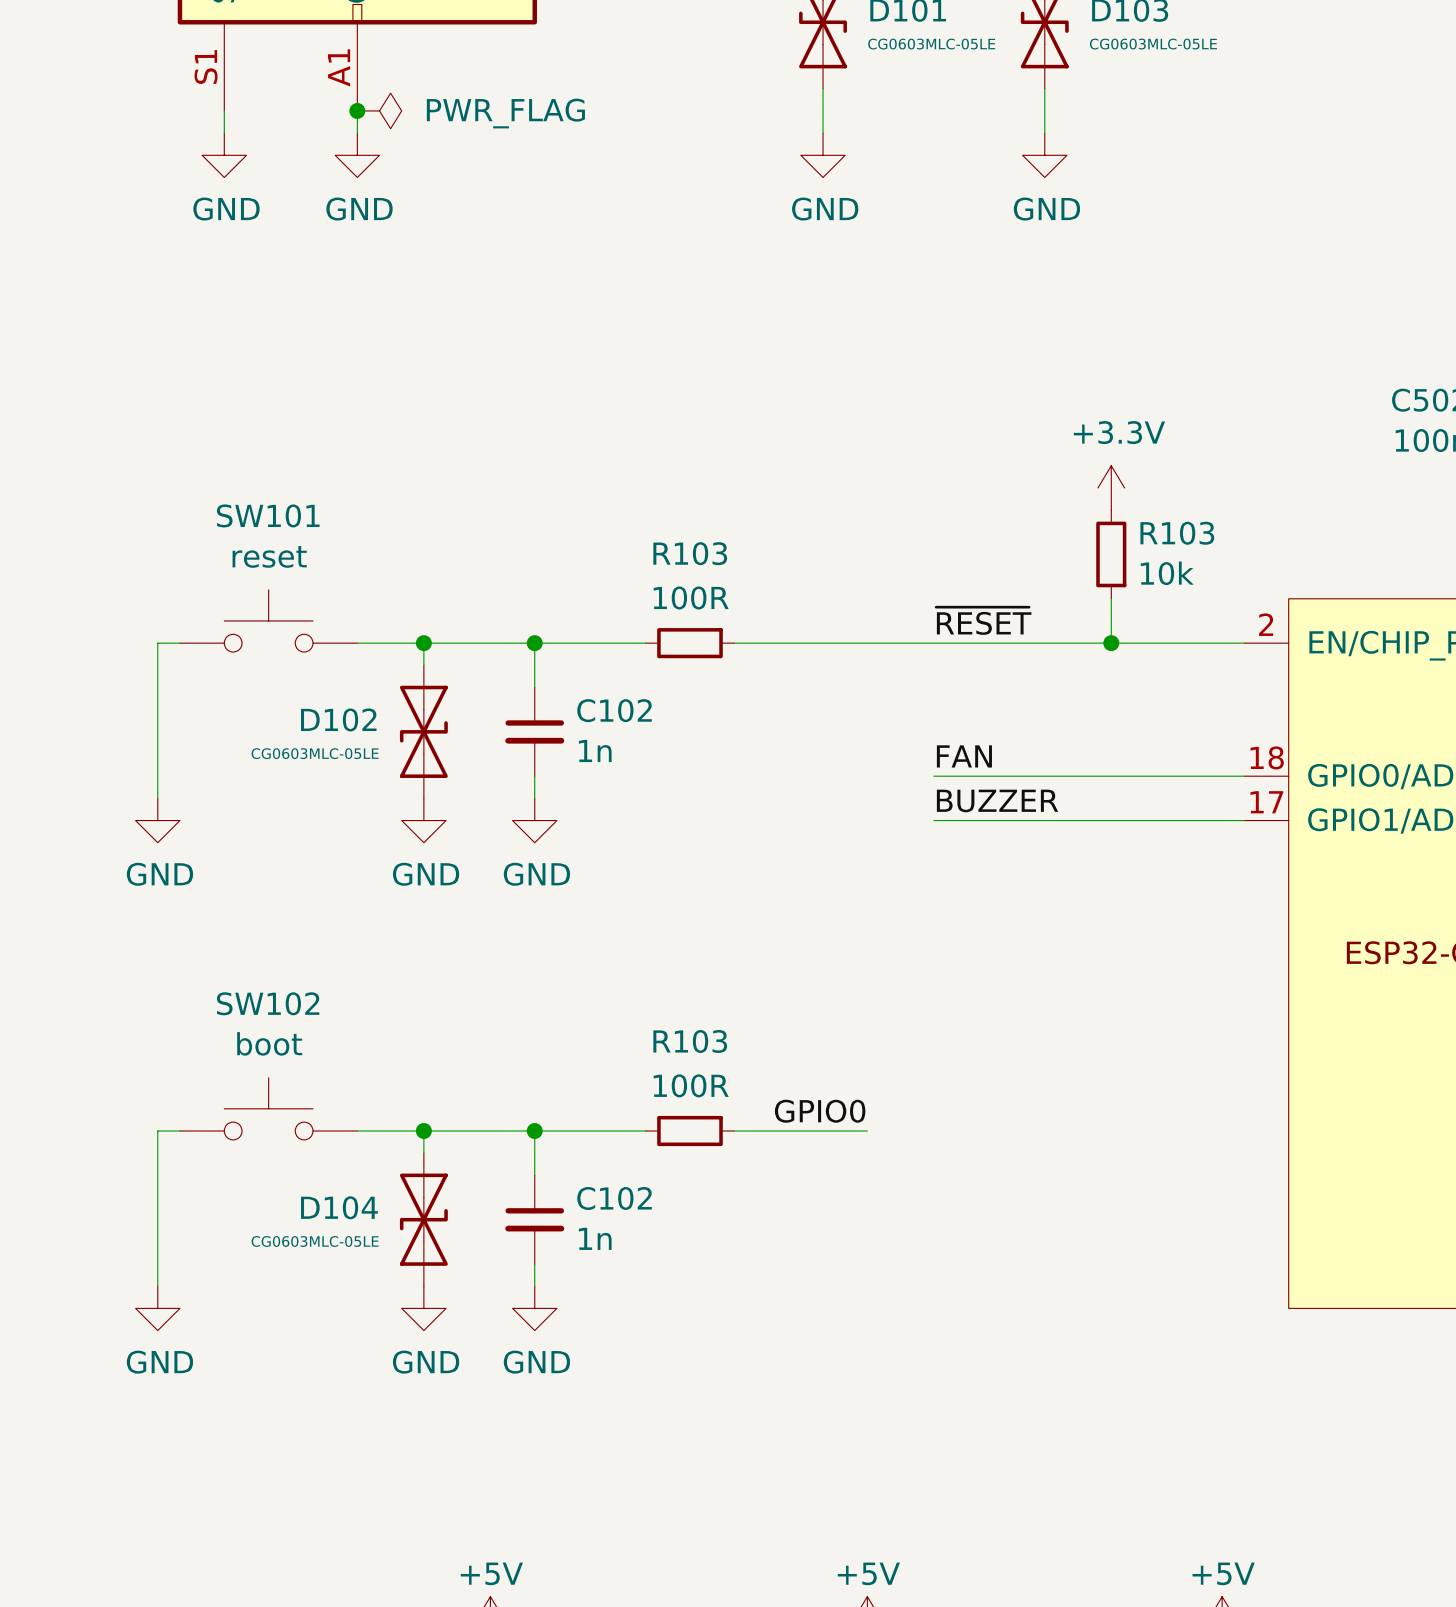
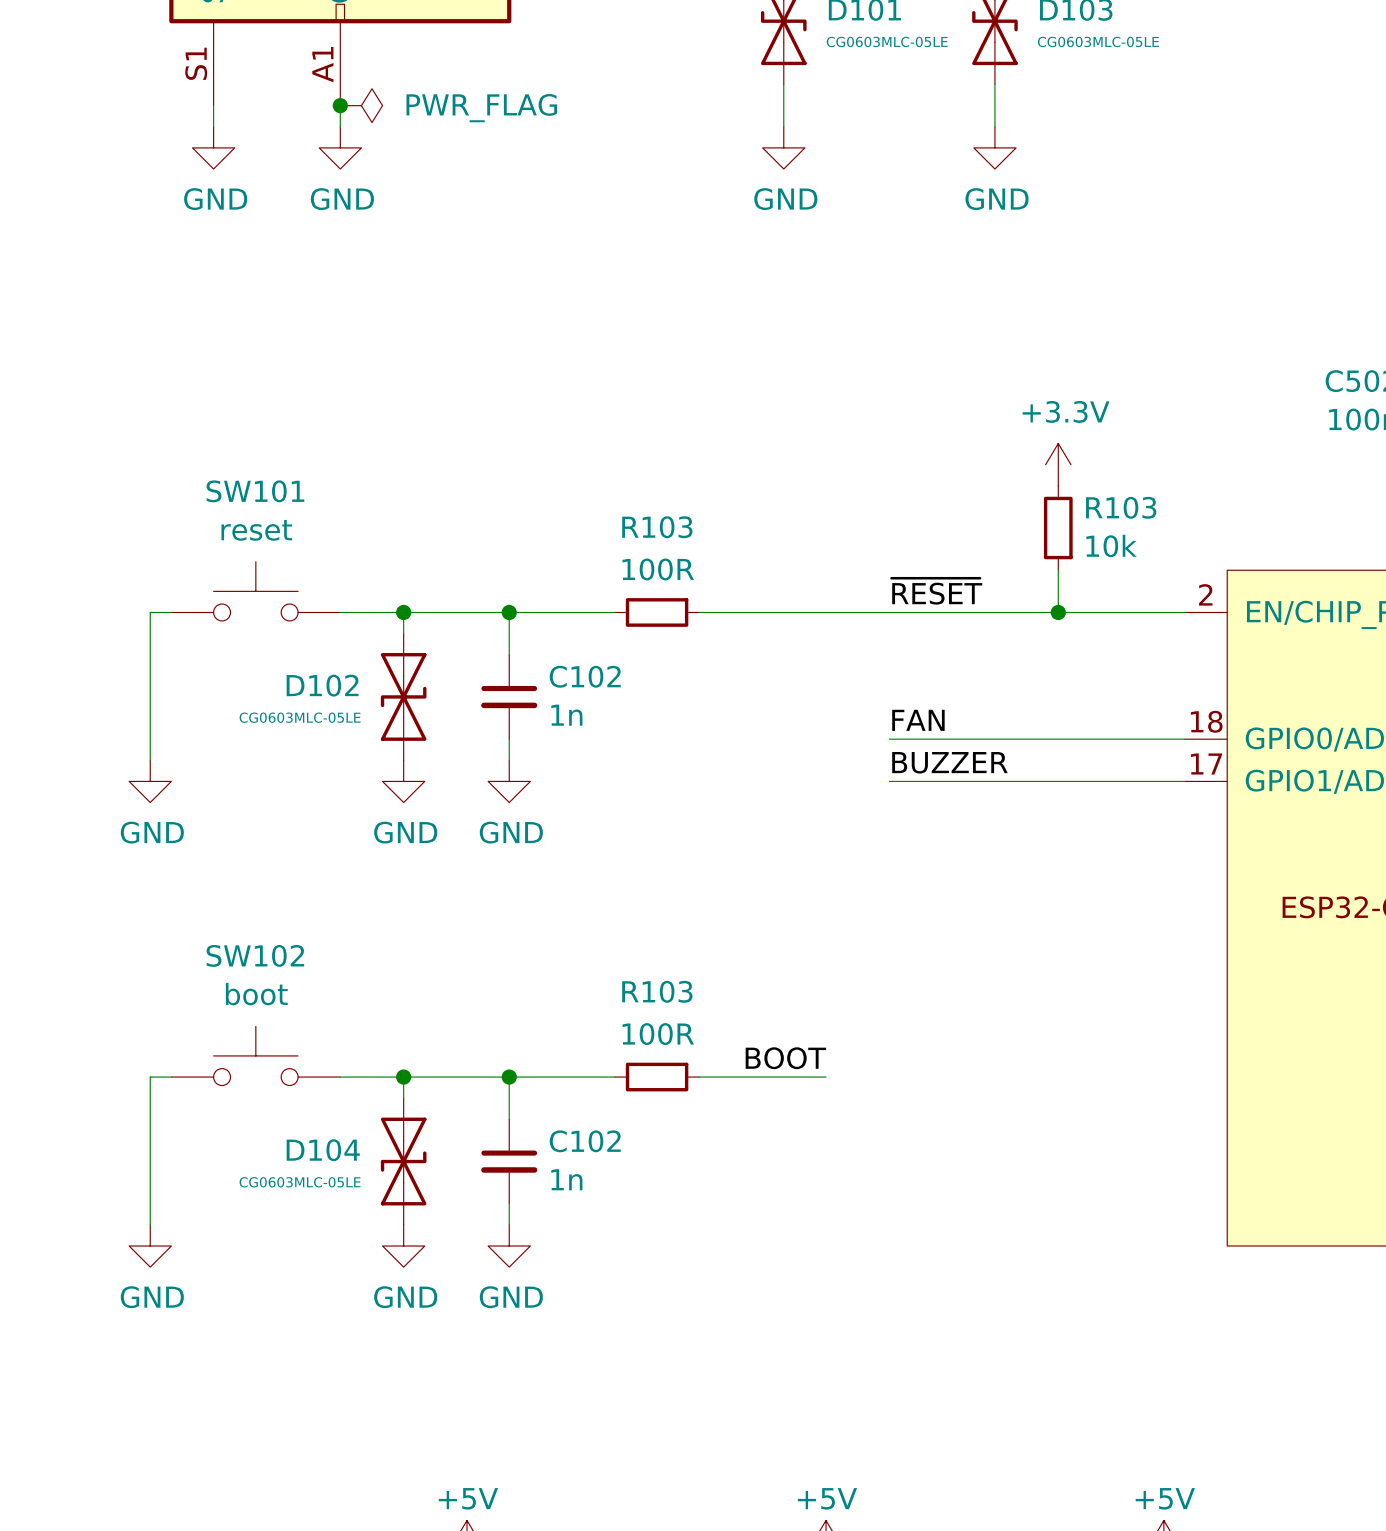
label: GPIO0 (820, 1111) -> BOOT (785, 1058)

